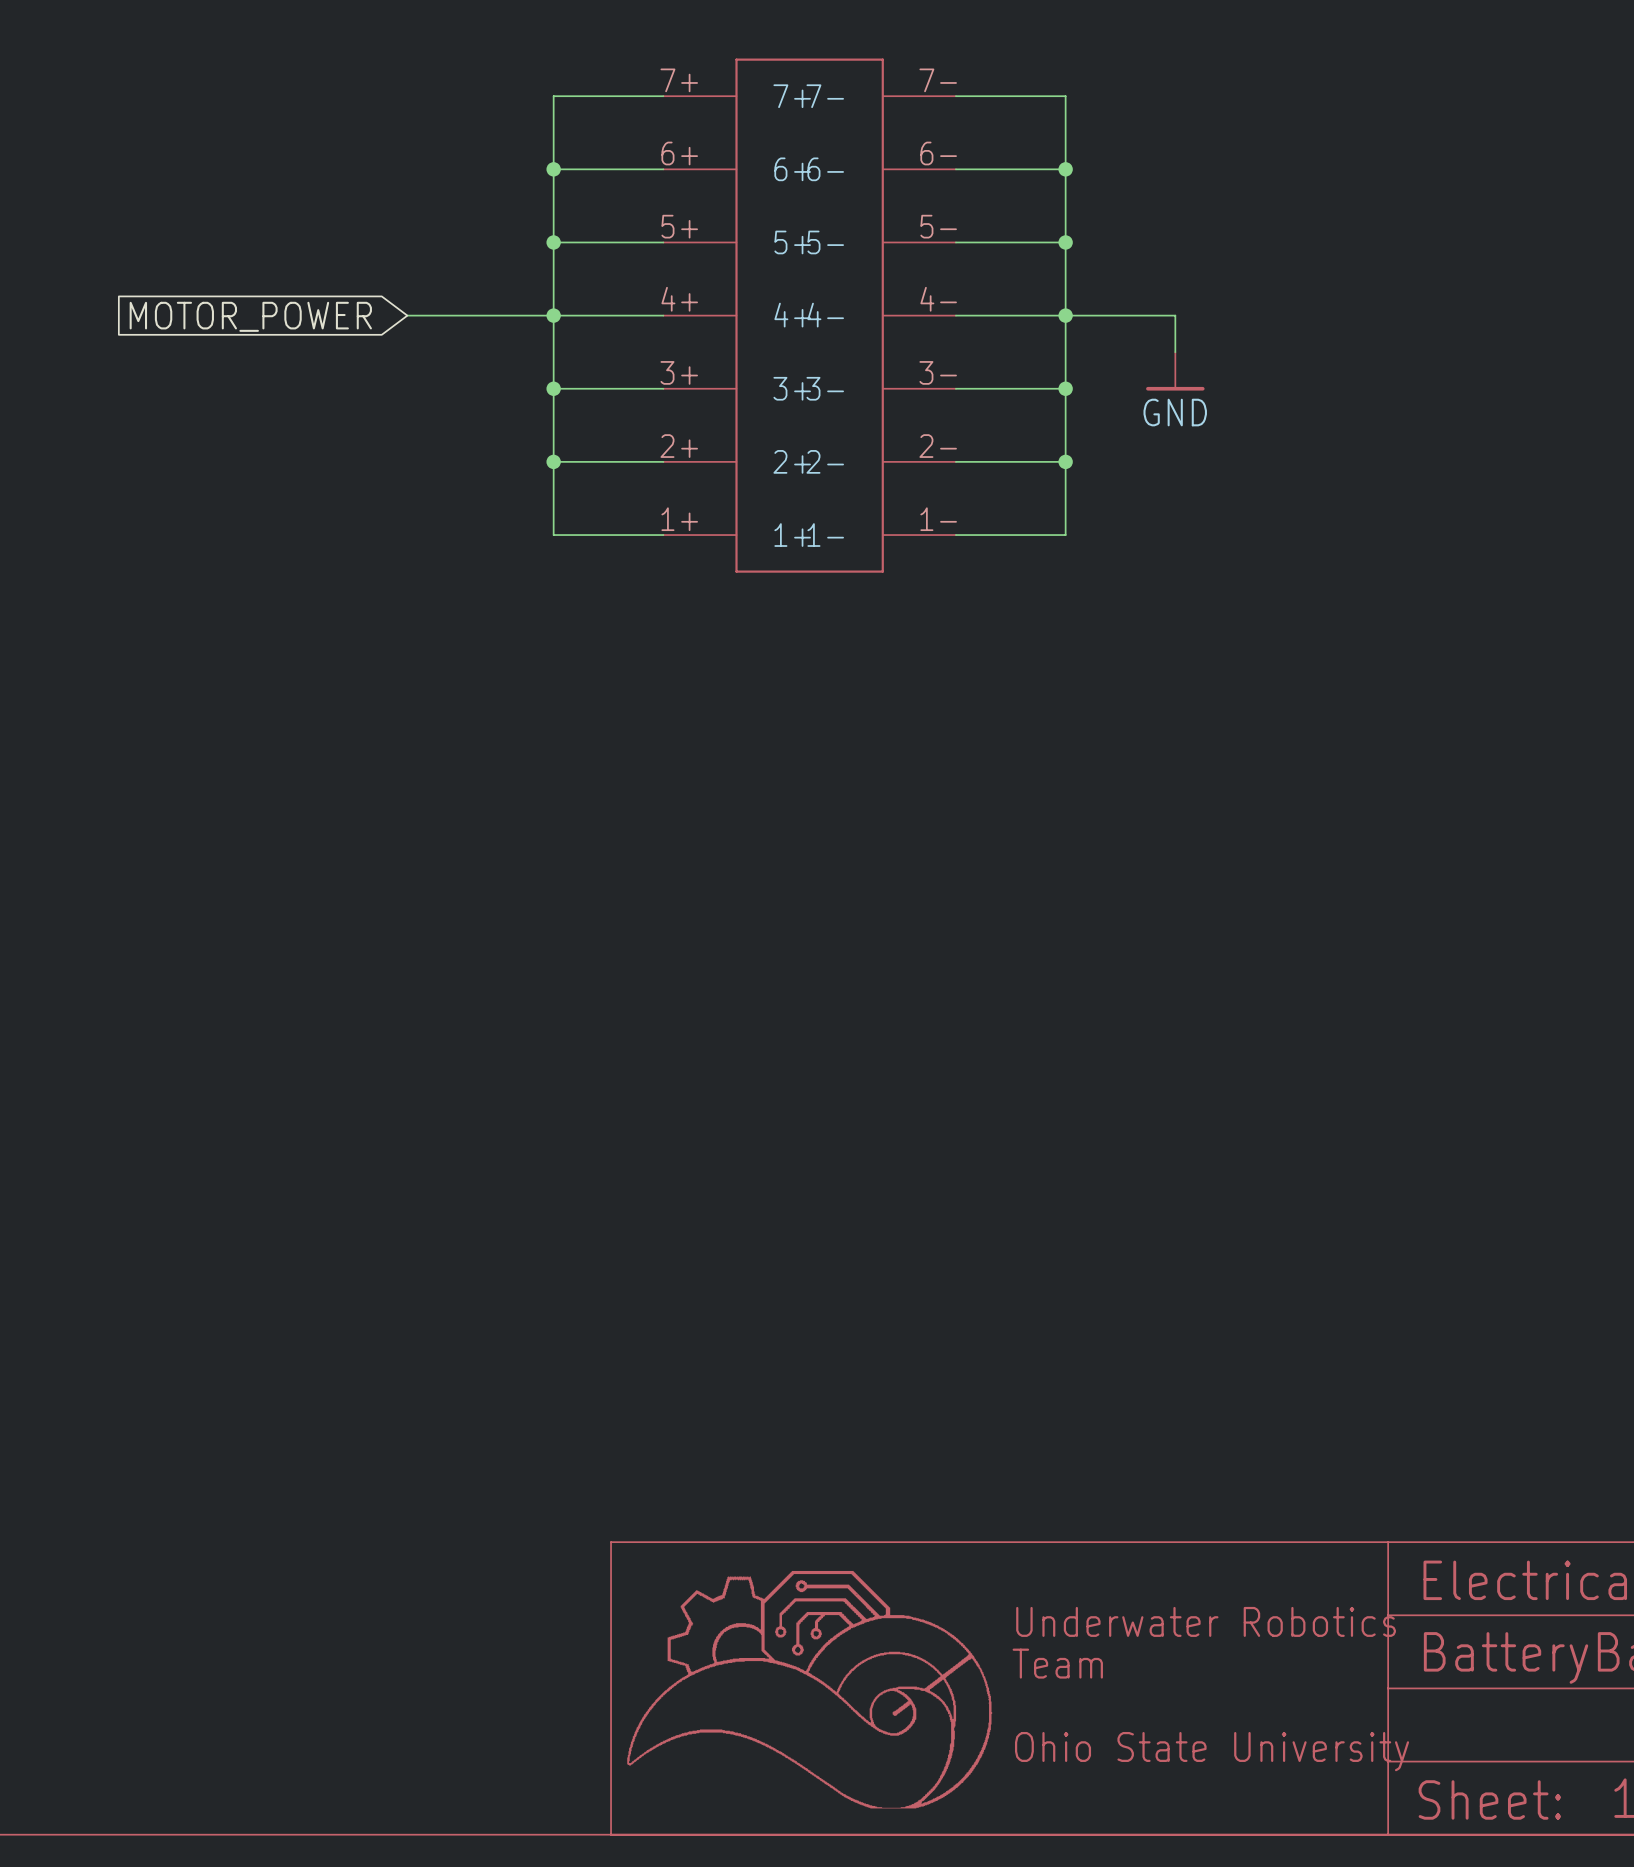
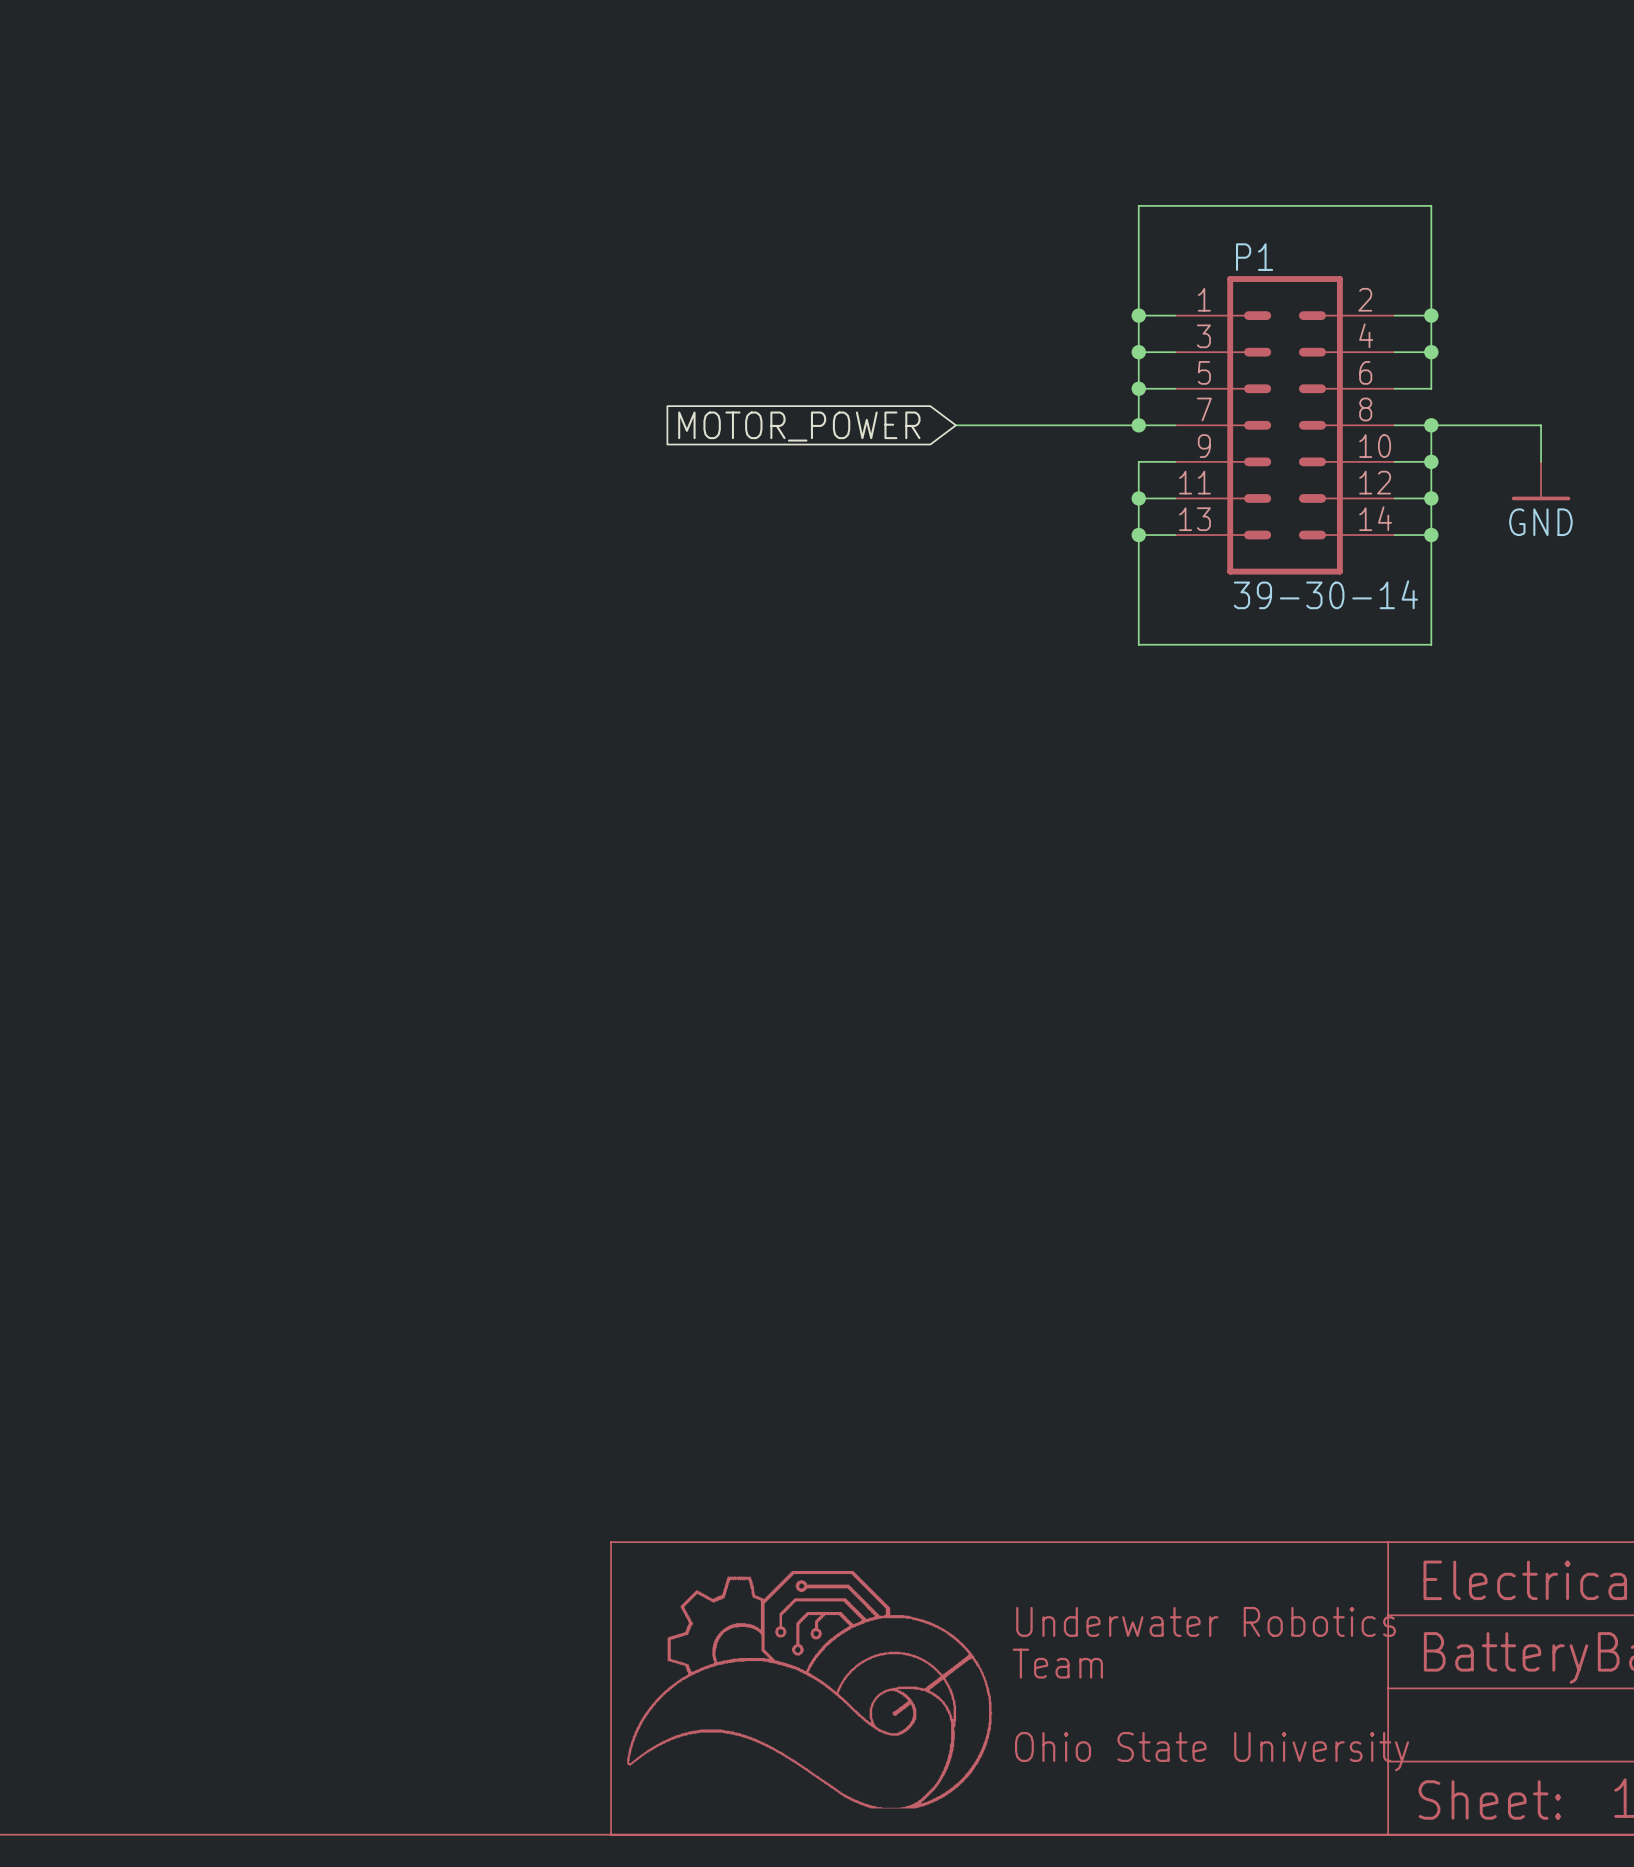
wire: (663, 96) (553, 96) (553, 535) (663, 535) -> none
wire: (955, 96) (1065, 96) (1065, 535) (955, 535) -> none
wire: (553, 169) (663, 169) -> none
junction: (553, 169) -> none
wire: (955, 169) (1065, 169) -> none
junction: (1065, 169) -> none
wire: (553, 242) (663, 242) -> none
junction: (553, 242) -> none
wire: (955, 242) (1065, 242) -> none
junction: (1065, 242) -> none
wire: (407, 315) (663, 315) -> none
junction: (553, 315) -> none
part: (809, 315) -> none
wire: (955, 315) (1138, 315) -> none
junction: (1065, 315) -> none
junction: none -> (1138, 315)
wire: (1175, 315) (1175, 352) -> (1138, 352) (1175, 352)
wire: none -> (1394, 315) (1431, 315)
junction: none -> (1431, 315)
global label: MOTOR_POWER (250, 316) -> none
junction: none -> (1138, 352)
wire: none -> (1394, 352) (1431, 352)
junction: none -> (1431, 352)
power symbol: GND (1175, 371) -> none
wire: (553, 388) (663, 388) -> none
junction: (553, 388) -> none
wire: (955, 388) (1065, 388) -> none
junction: (1065, 388) -> none
junction: none -> (1138, 388)
wire: none -> (1394, 388) (1431, 388) (1431, 205) (1138, 205) (1138, 425)
wire: none -> (955, 425) (1175, 425)
junction: none -> (1138, 425)
P1: none -> 39-30-14 (1285, 425)
wire: none -> (1394, 425) (1541, 425) (1541, 461)
wire: none -> (1431, 425) (1431, 644) (1138, 644) (1138, 461) (1175, 461)
junction: none -> (1431, 425)
global label: none -> MOTOR_POWER (799, 426)
wire: (553, 461) (663, 461) -> none
junction: (553, 461) -> none
wire: (955, 461) (1065, 461) -> none
junction: (1065, 461) -> none
wire: none -> (1394, 461) (1431, 461)
junction: none -> (1431, 461)
power symbol: none -> GND (1541, 481)
wire: none -> (1138, 498) (1175, 498)
junction: none -> (1138, 498)
wire: none -> (1394, 498) (1431, 498)
junction: none -> (1431, 498)
wire: none -> (1138, 535) (1175, 535)
junction: none -> (1138, 535)
wire: none -> (1394, 535) (1431, 535)
junction: none -> (1431, 535)

